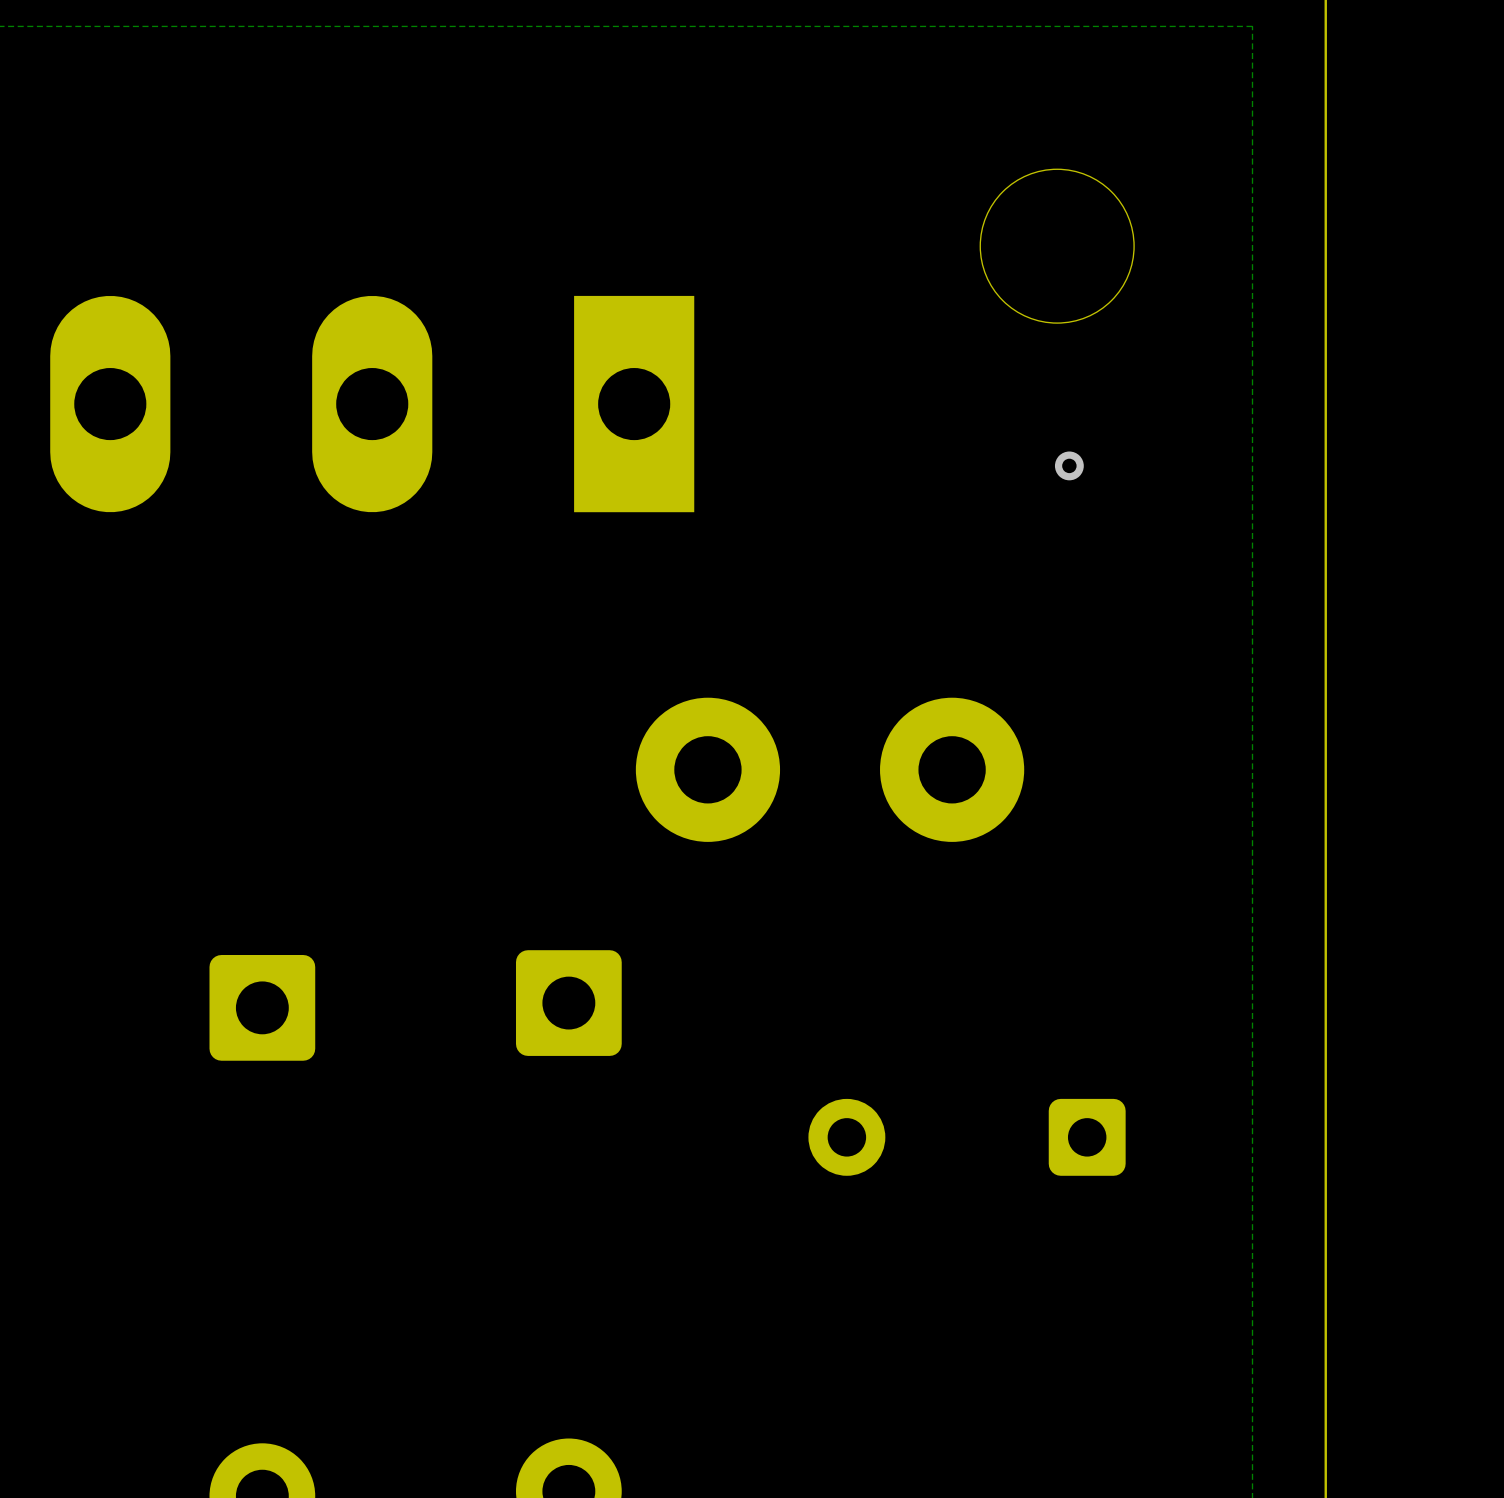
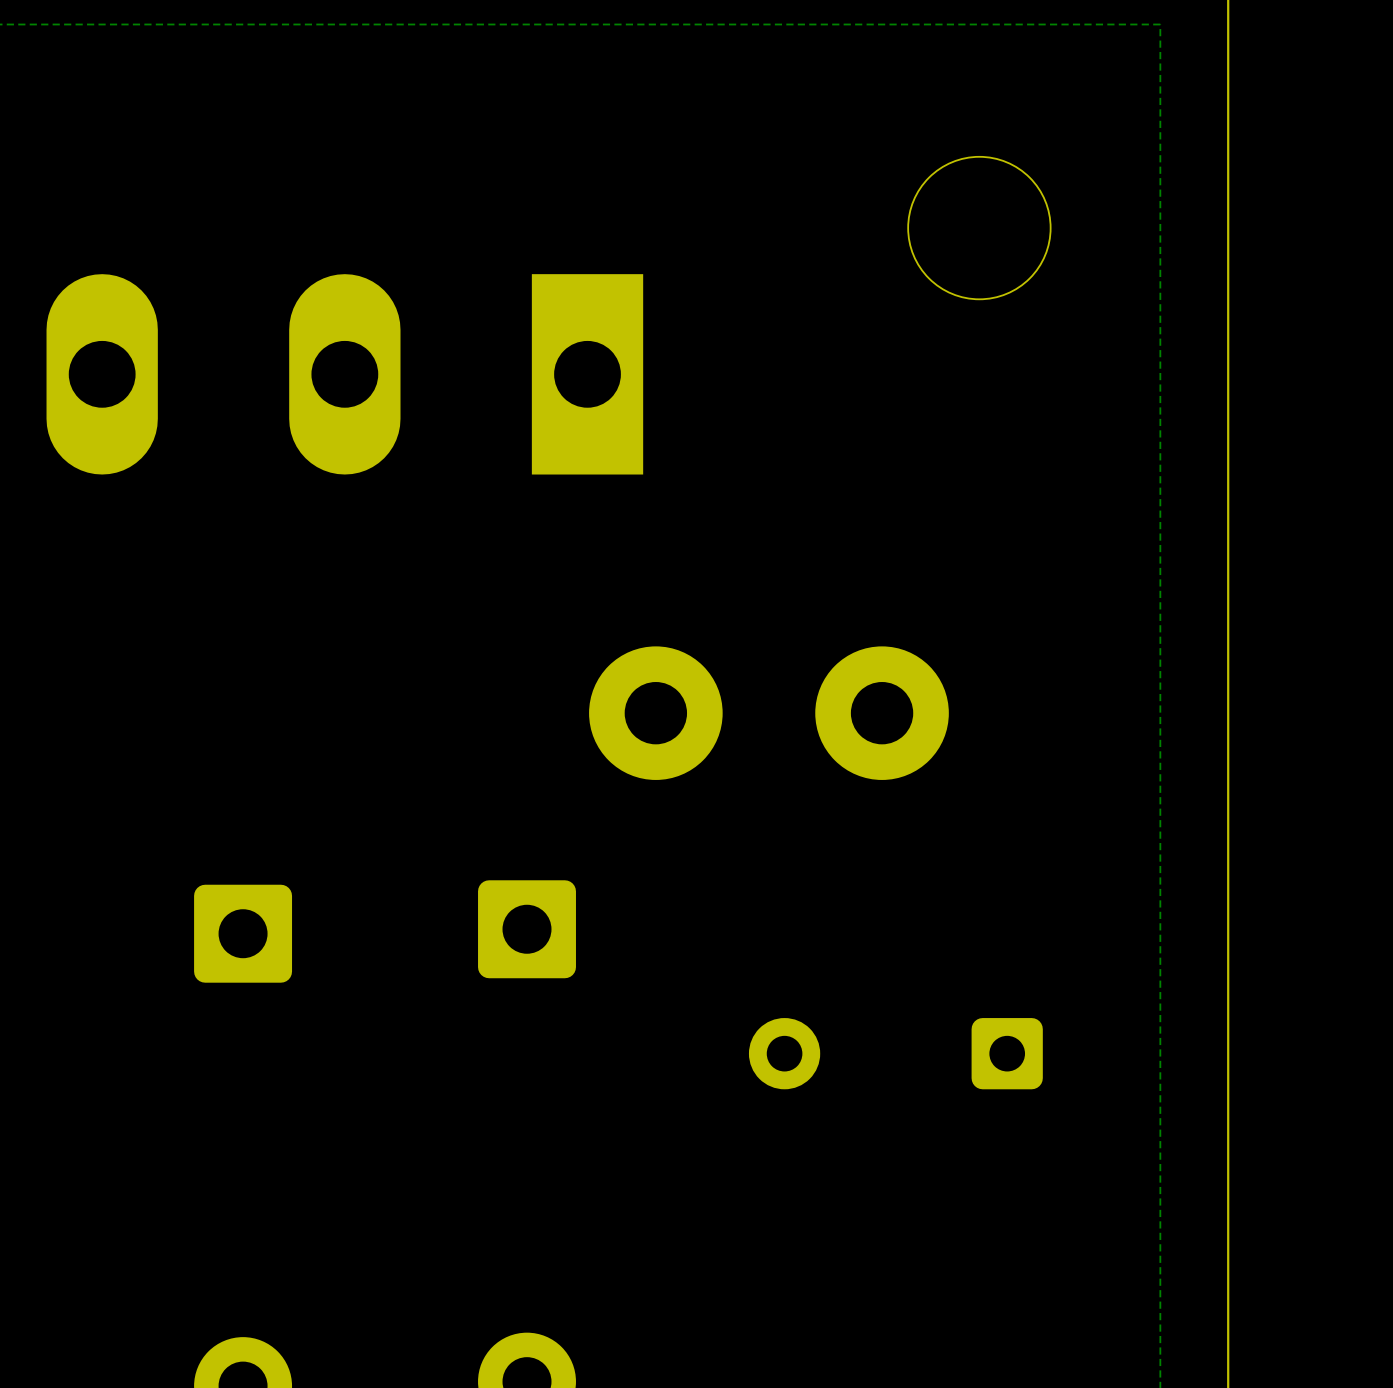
via: (1069, 465) -> none

